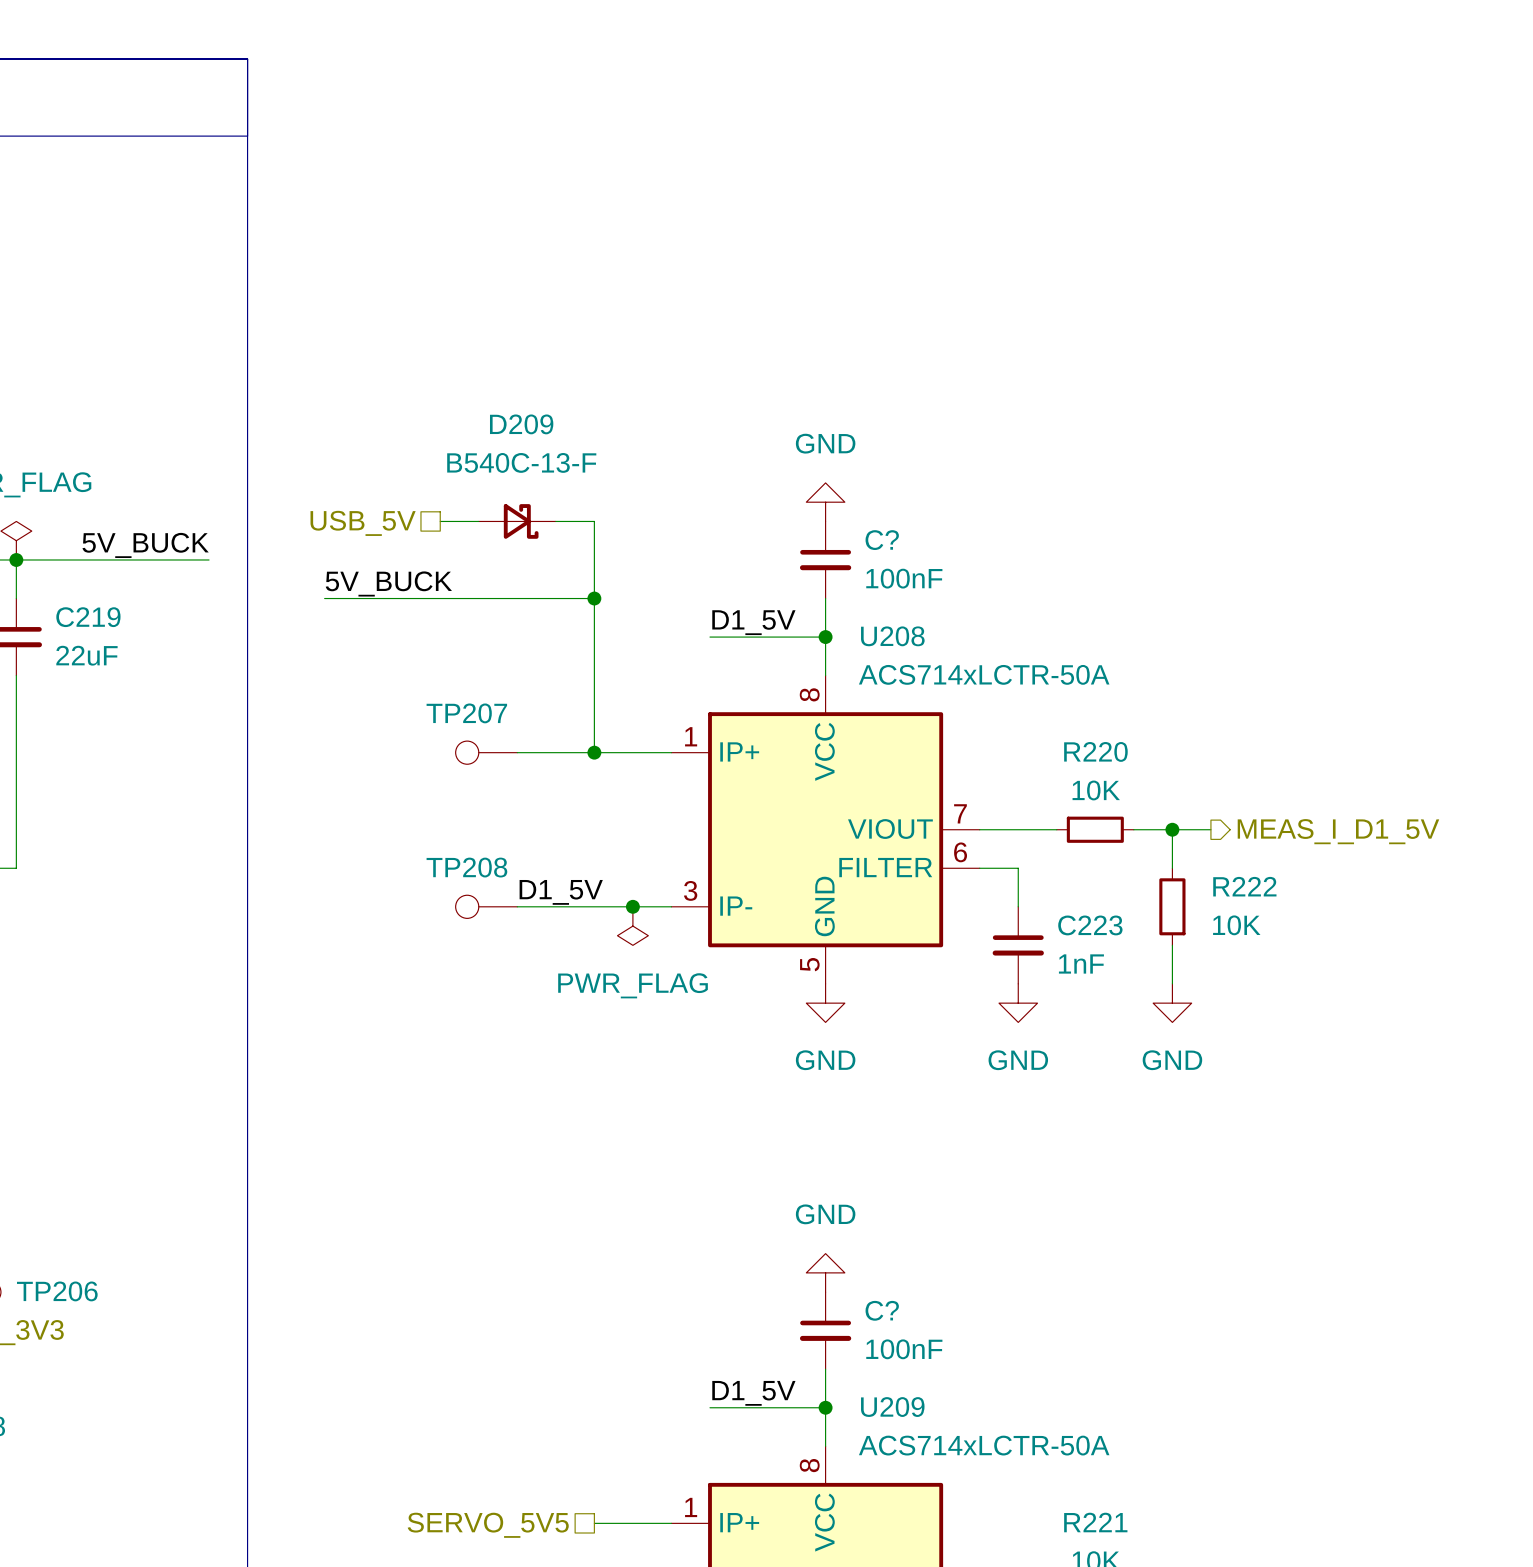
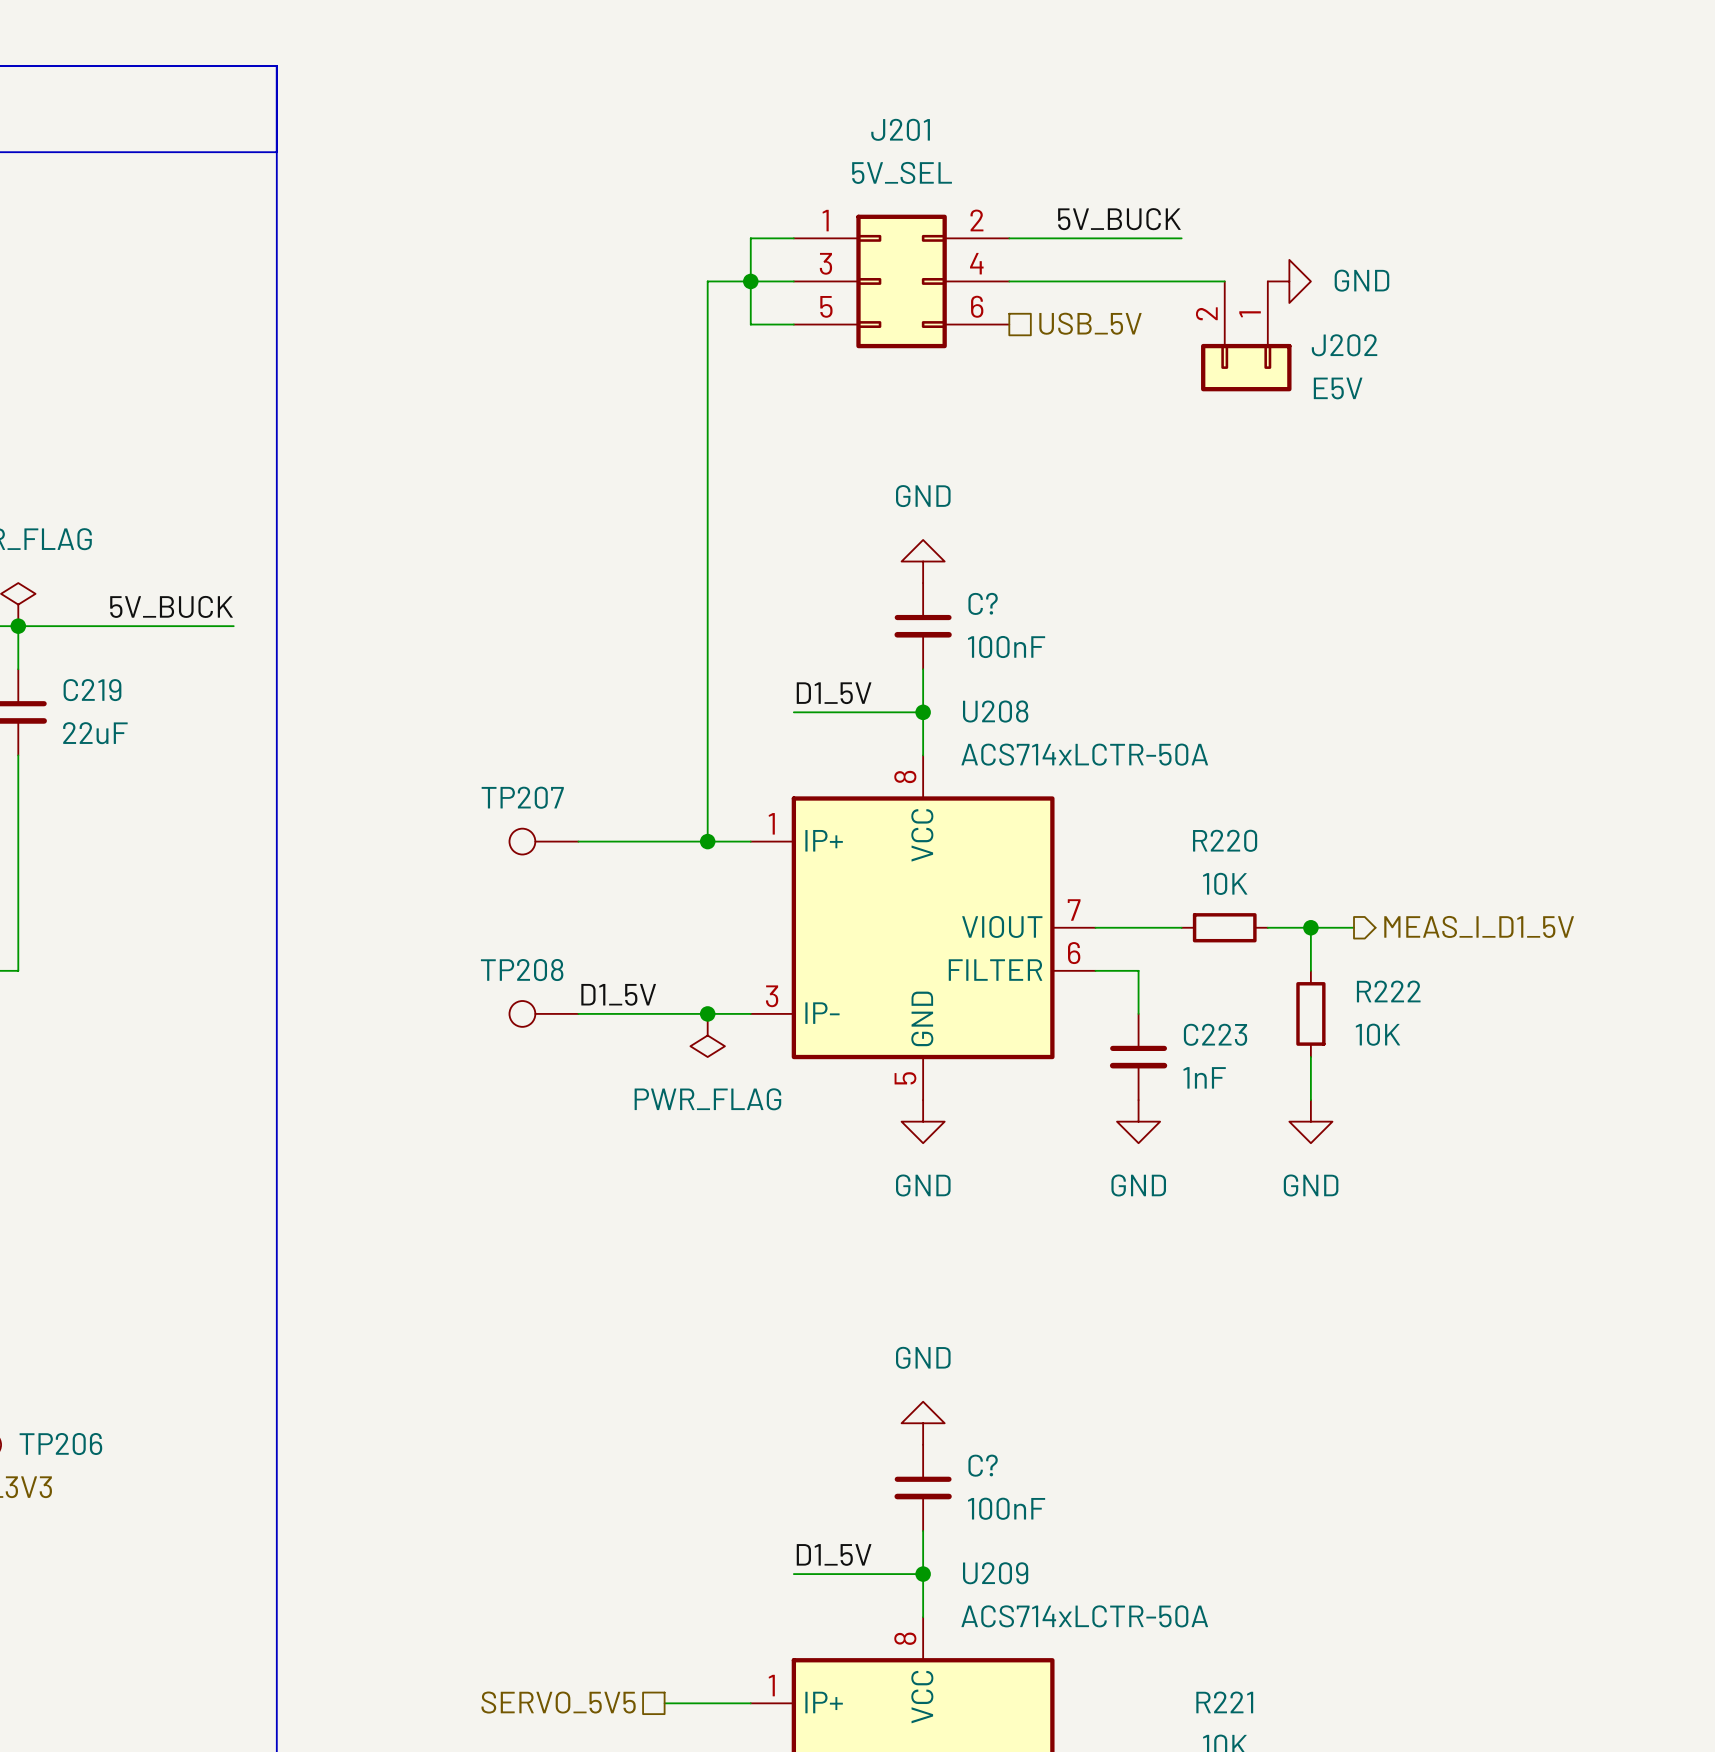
label: none -> 5V_BUCK (1119, 219)
wire: none -> (793, 238) (750, 238) (750, 324) (793, 324)
wire: none -> (1009, 238) (1181, 238)
junction: none -> (750, 281)
wire: none -> (793, 281) (707, 281) (707, 841)
J201: none -> 5V_SEL (901, 281)
wire: none -> (1009, 281) (1224, 281)
power symbol: none -> GND (1289, 281)
hierarchical label: none -> USB_5V (1090, 323)
J202: none -> E5V (1246, 336)
wire: (440, 521) (478, 521) -> none
D209: B540C-13-F (517, 521) -> none
wire: (555, 521) (594, 521) (594, 752) -> none
hierarchical label: USB_5V (363, 523) -> none
label: 5V_BUCK (388, 583) -> none
wire: (324, 598) (594, 598) -> none
junction: (594, 598) -> none
junction position: (594, 752) -> (707, 841)

